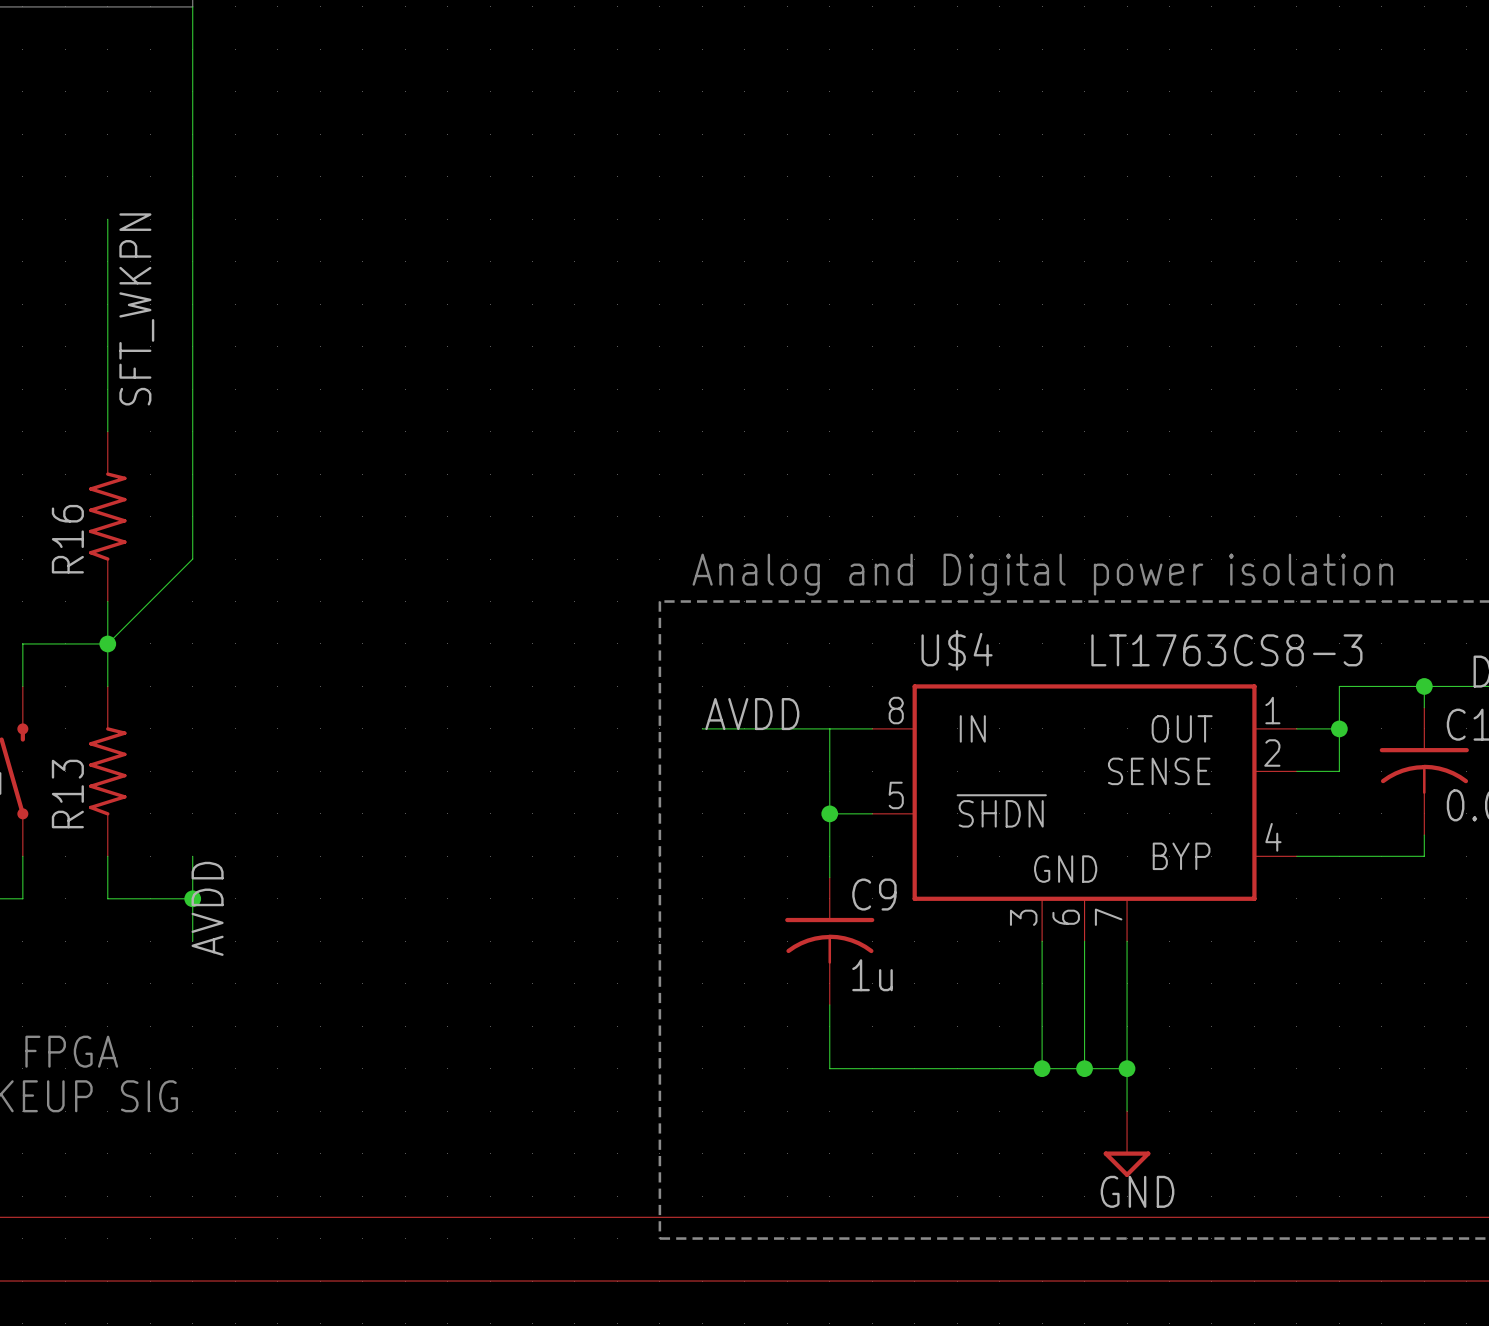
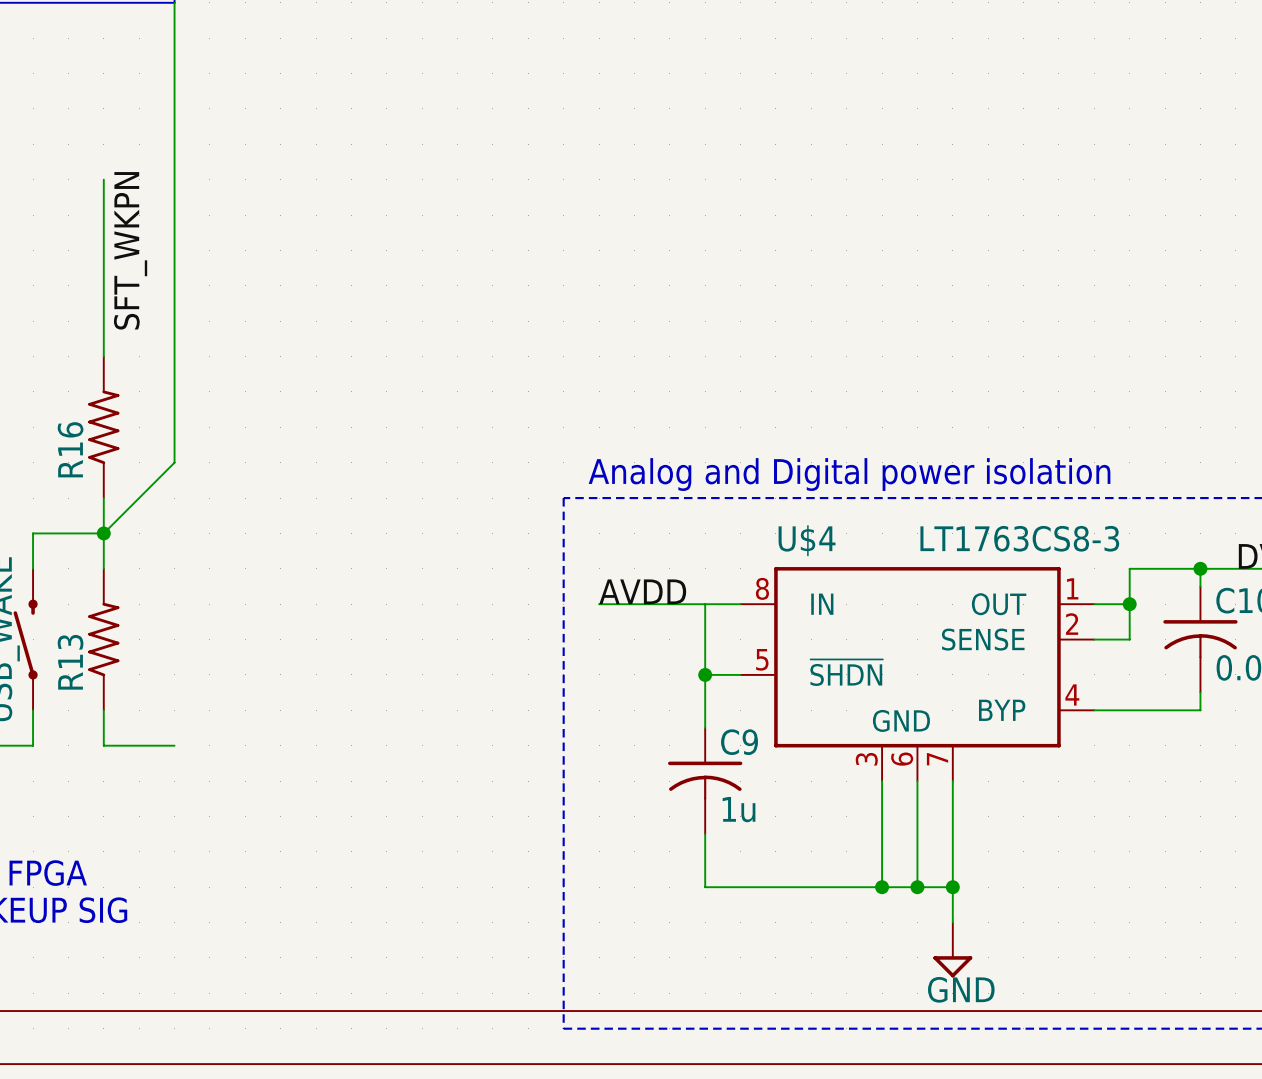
wire: (192, 856) (192, 941) -> none
junction: (192, 898) -> none
label: AVDD (207, 908) -> none

